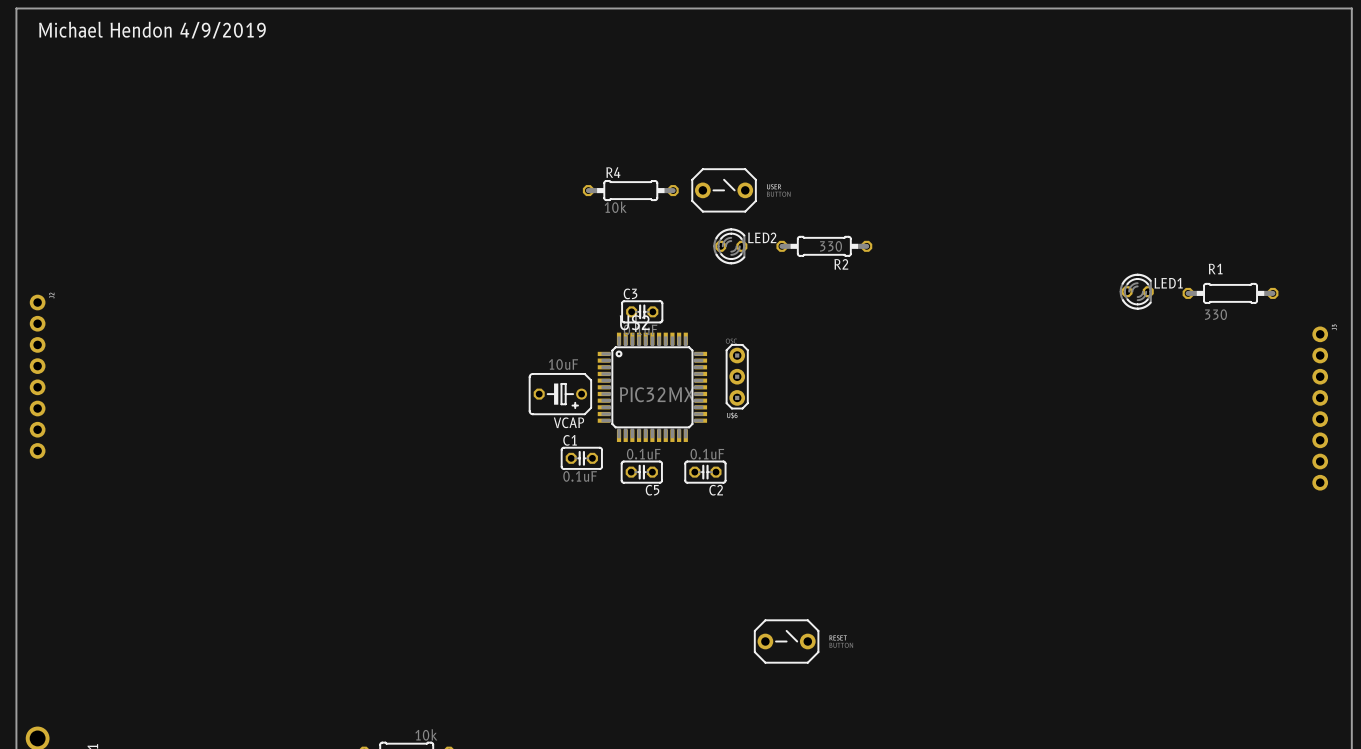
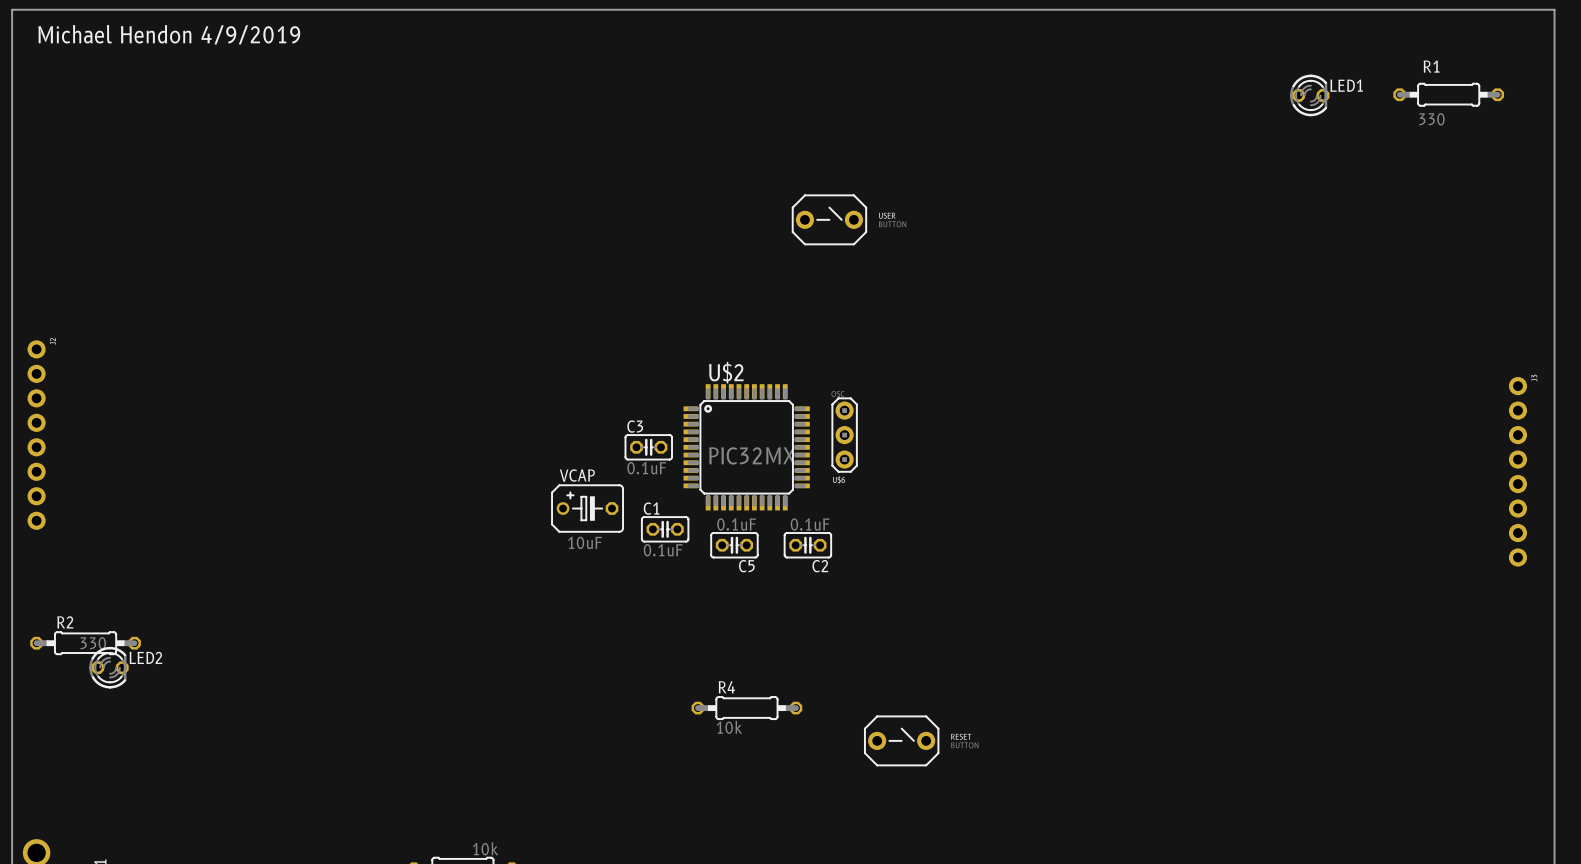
R4 position: (630, 190) -> (746, 708)
LED2 position: (730, 246) -> (108, 667)
R2 position: (824, 246) -> (85, 643)
R2 name position: R2 (841, 264) -> R2 (65, 622)
LED1 position: (1136, 291) -> (1309, 95)
R1 position: (1230, 293) -> (1448, 94)
C3 position: (642, 311) -> (648, 447)
VCAP rotation: 0° (560, 394) -> 180° (587, 508)
VCAP position: (560, 394) -> (587, 508)

